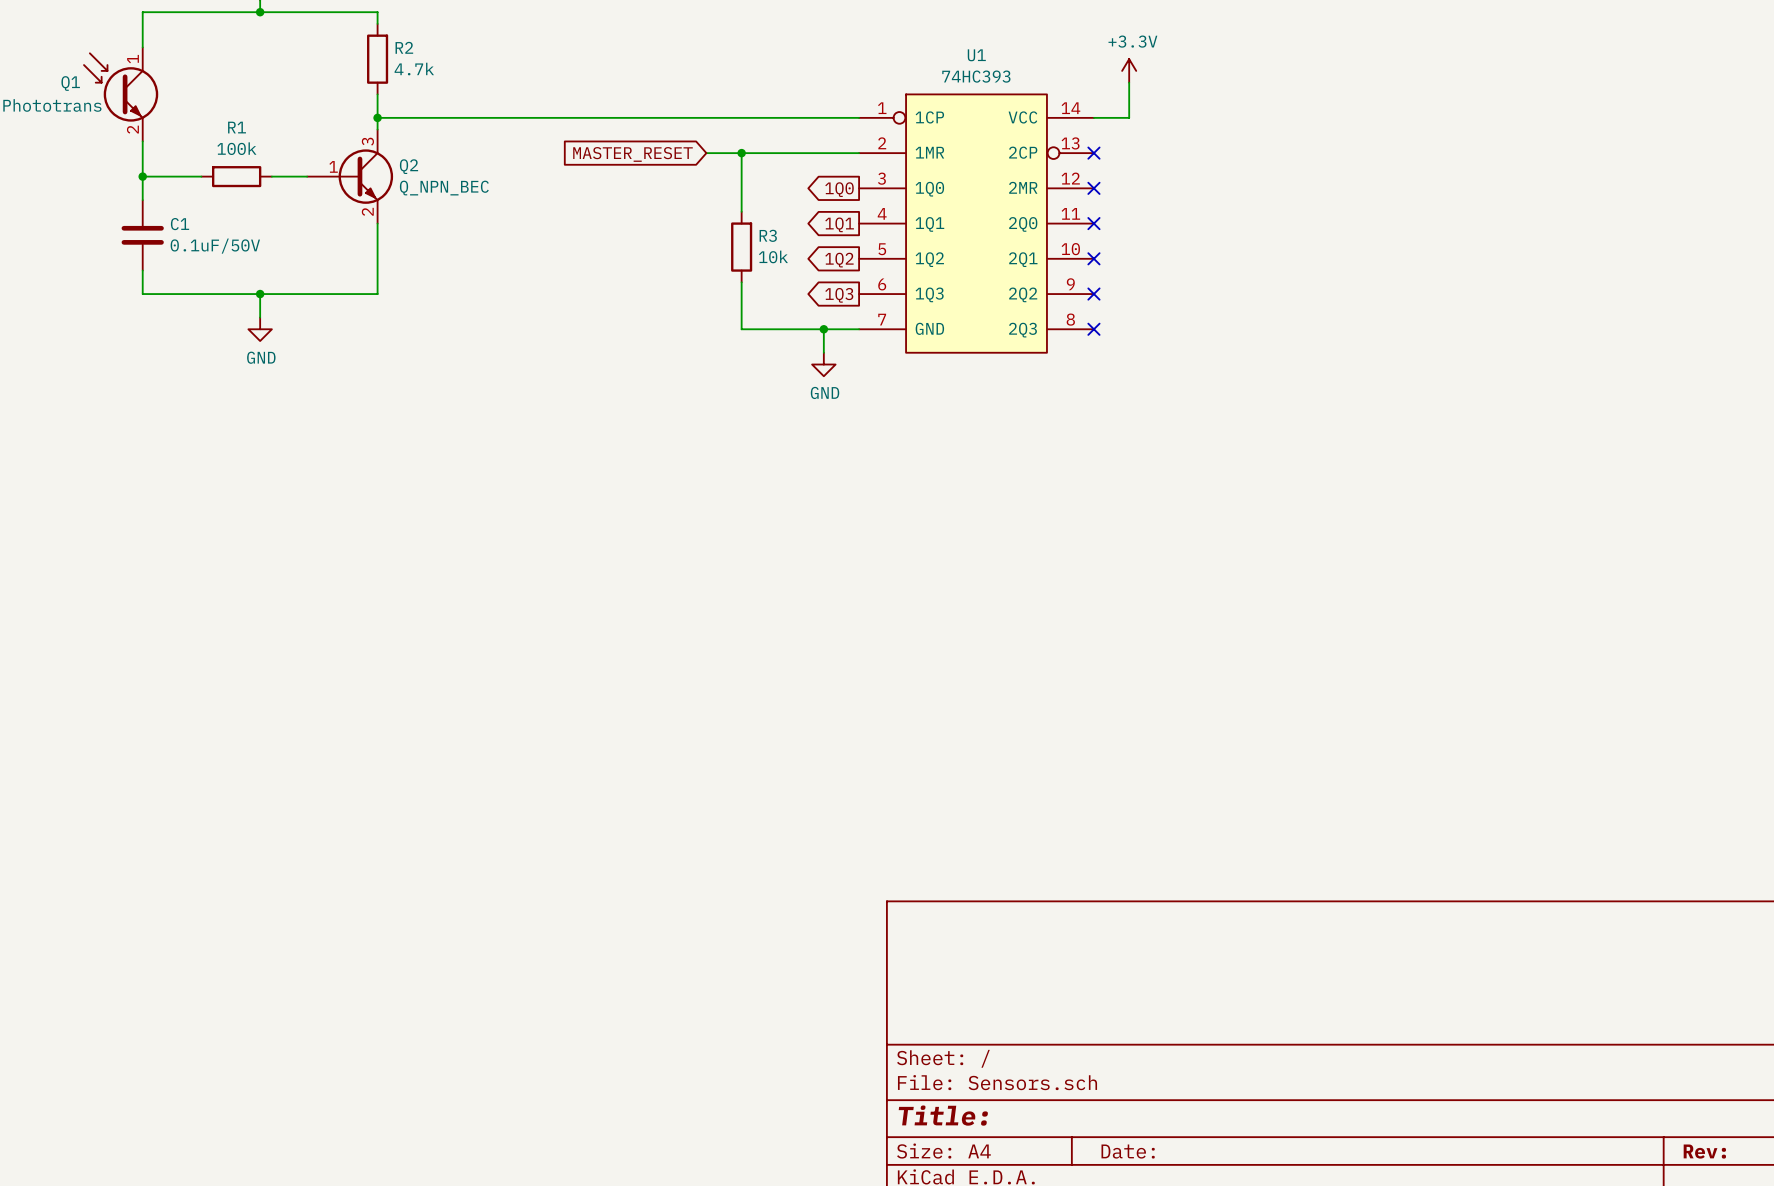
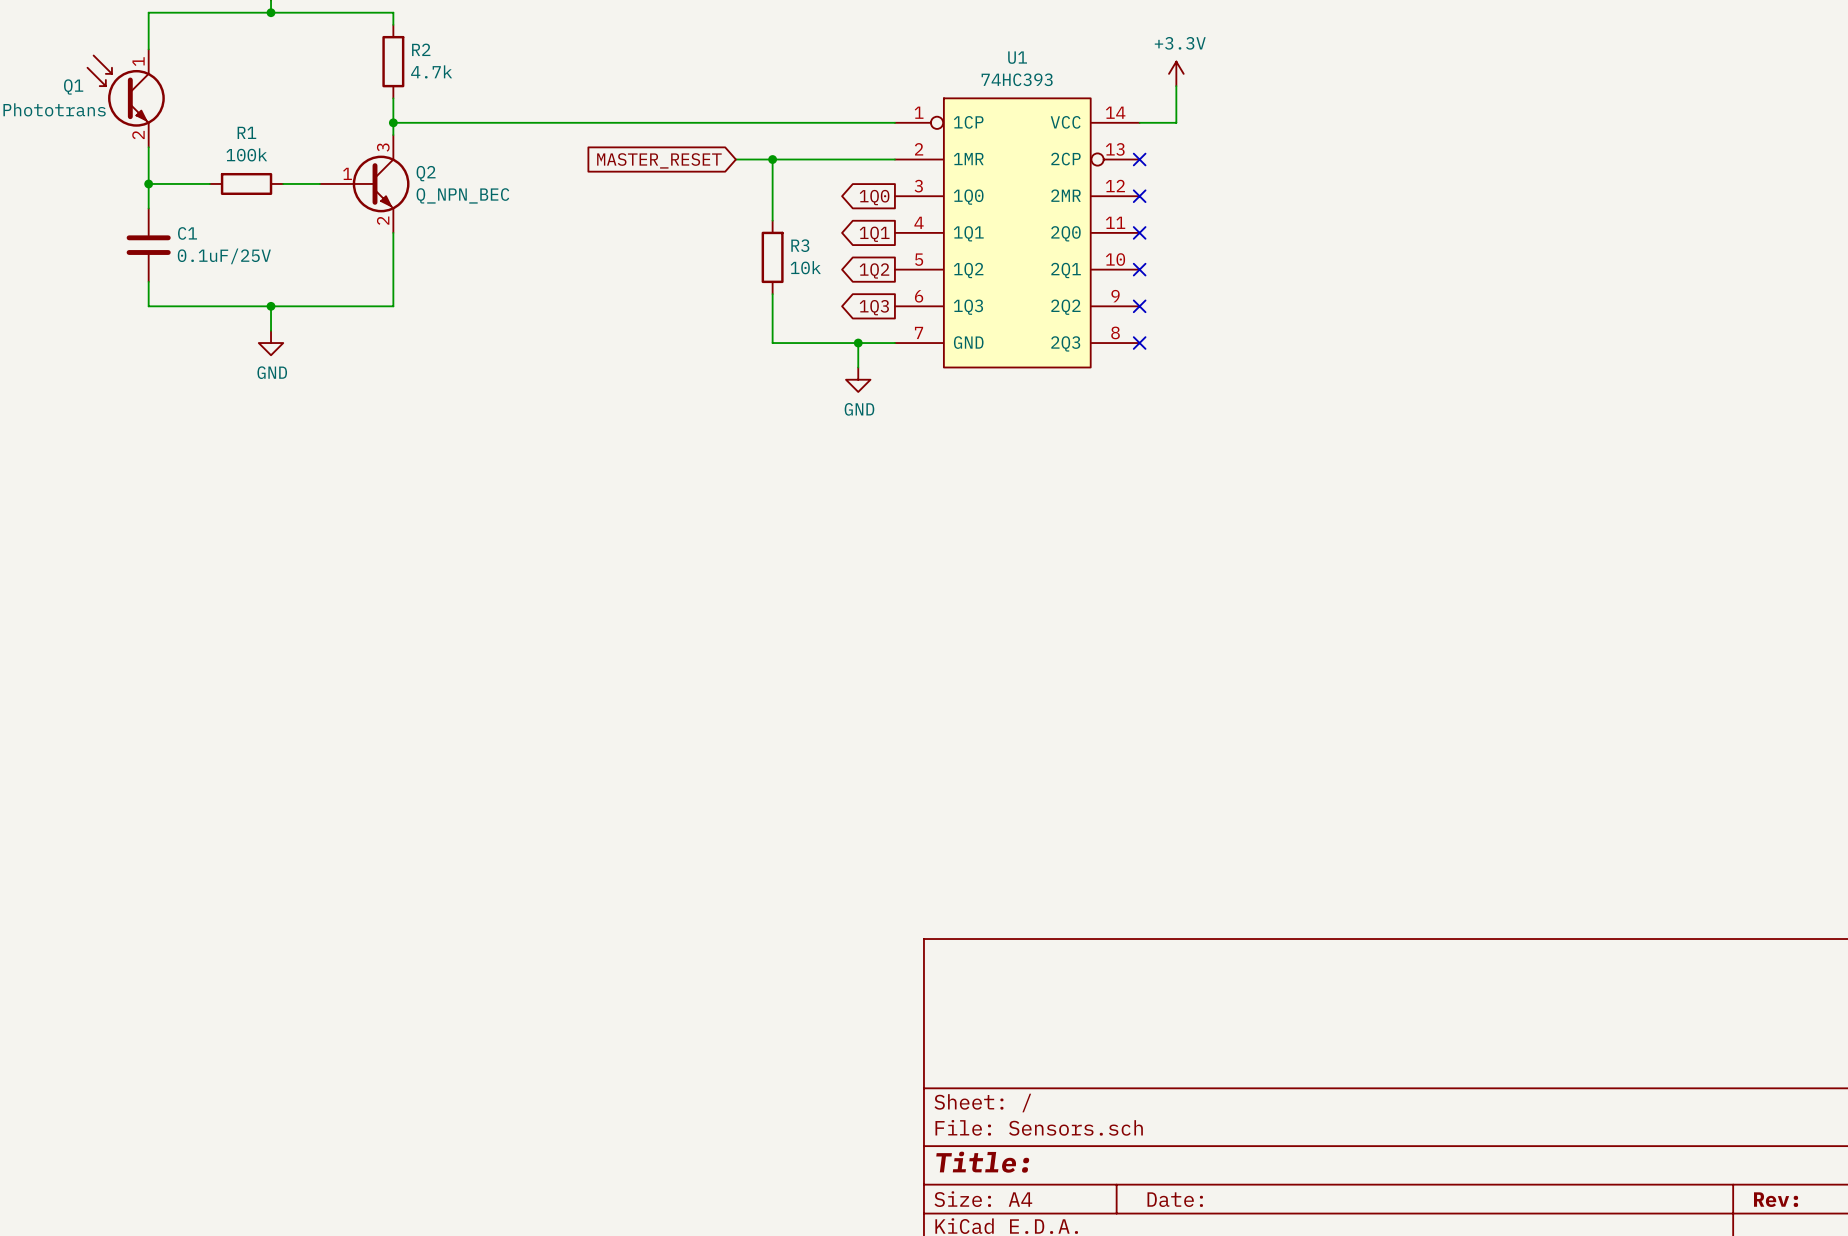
C1 value: 0.1uF/50V (215, 246) -> 0.1uF/25V (224, 256)

